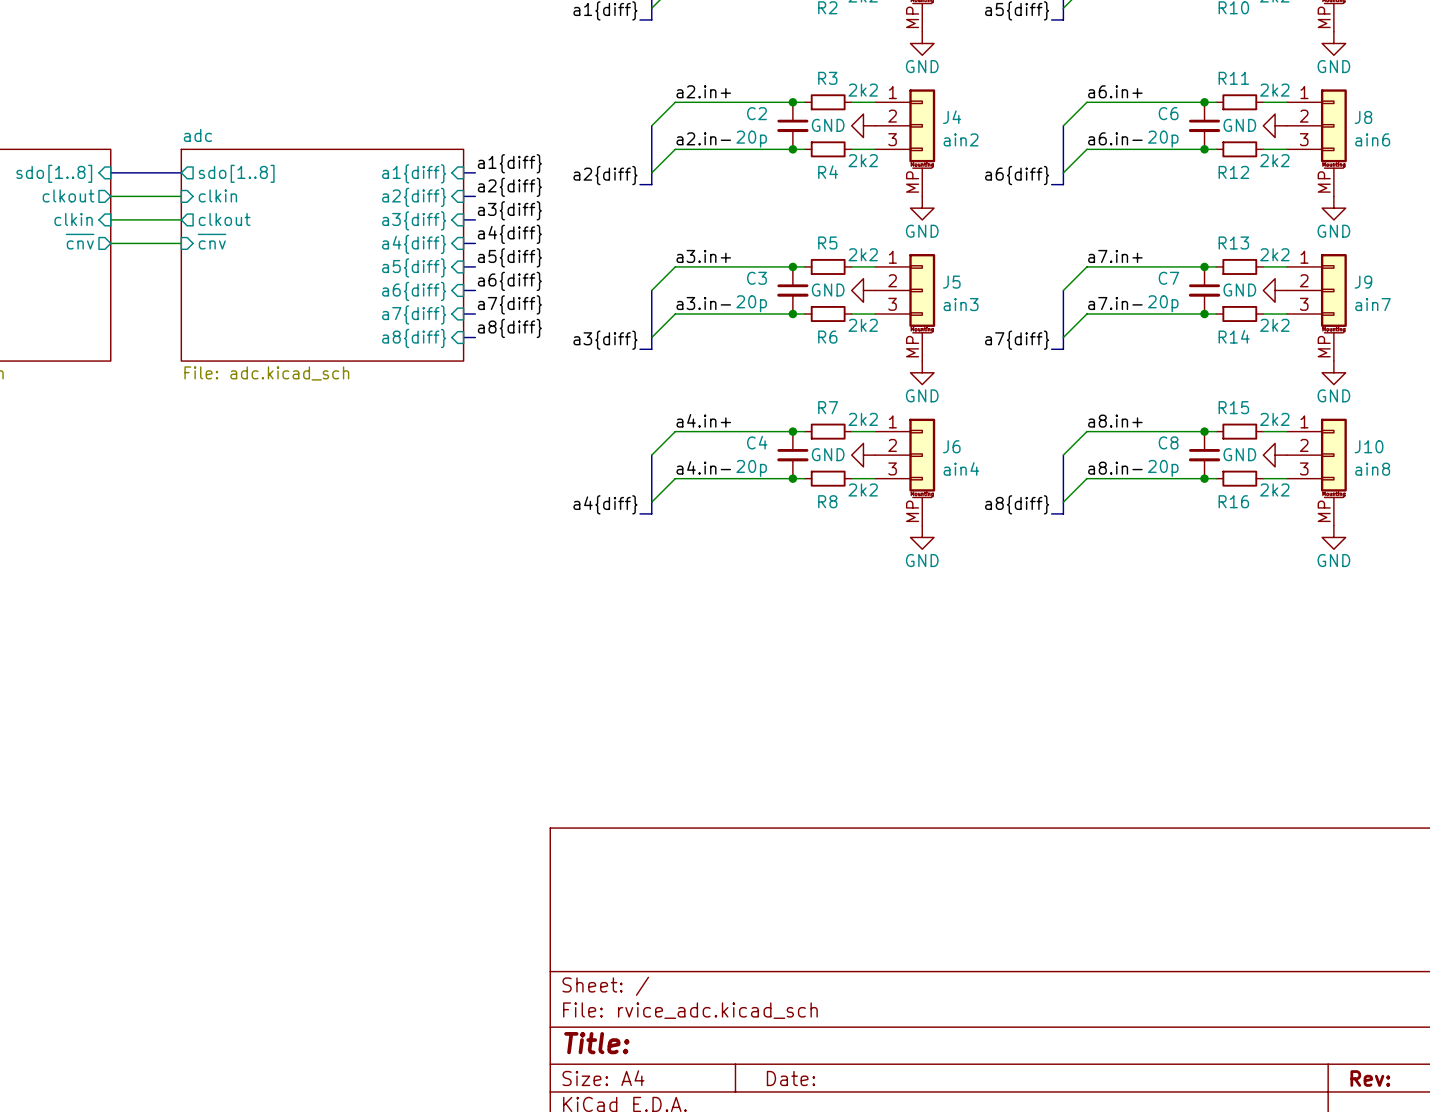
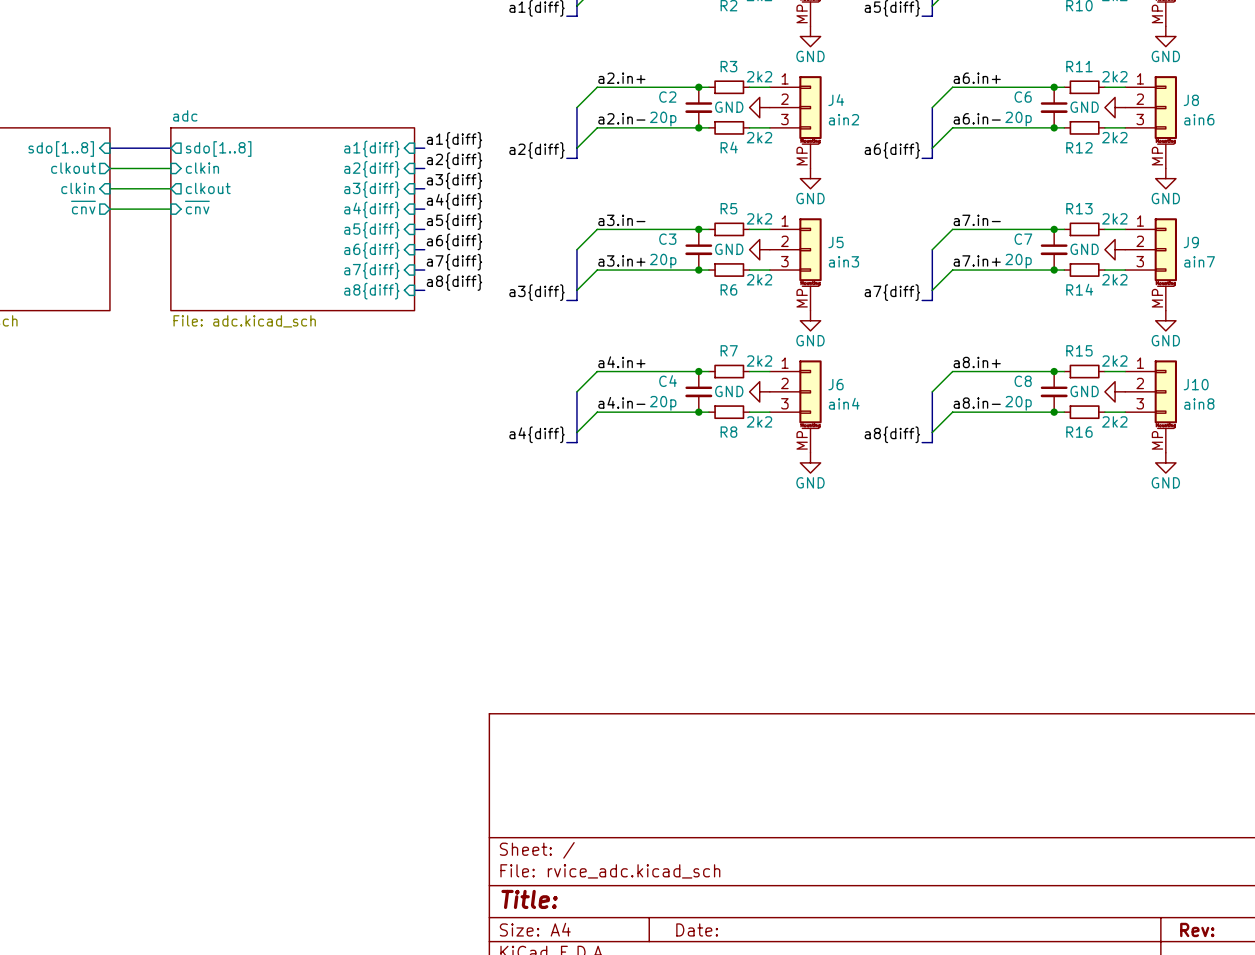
label: a3.in+ (703, 256) -> a3.in- (621, 220)
label: a7.in+ (1115, 256) -> a7.in- (977, 220)
label: a3.in- (703, 303) -> a3.in+ (621, 260)
label: a7.in- (1115, 303) -> a7.in+ (977, 260)

